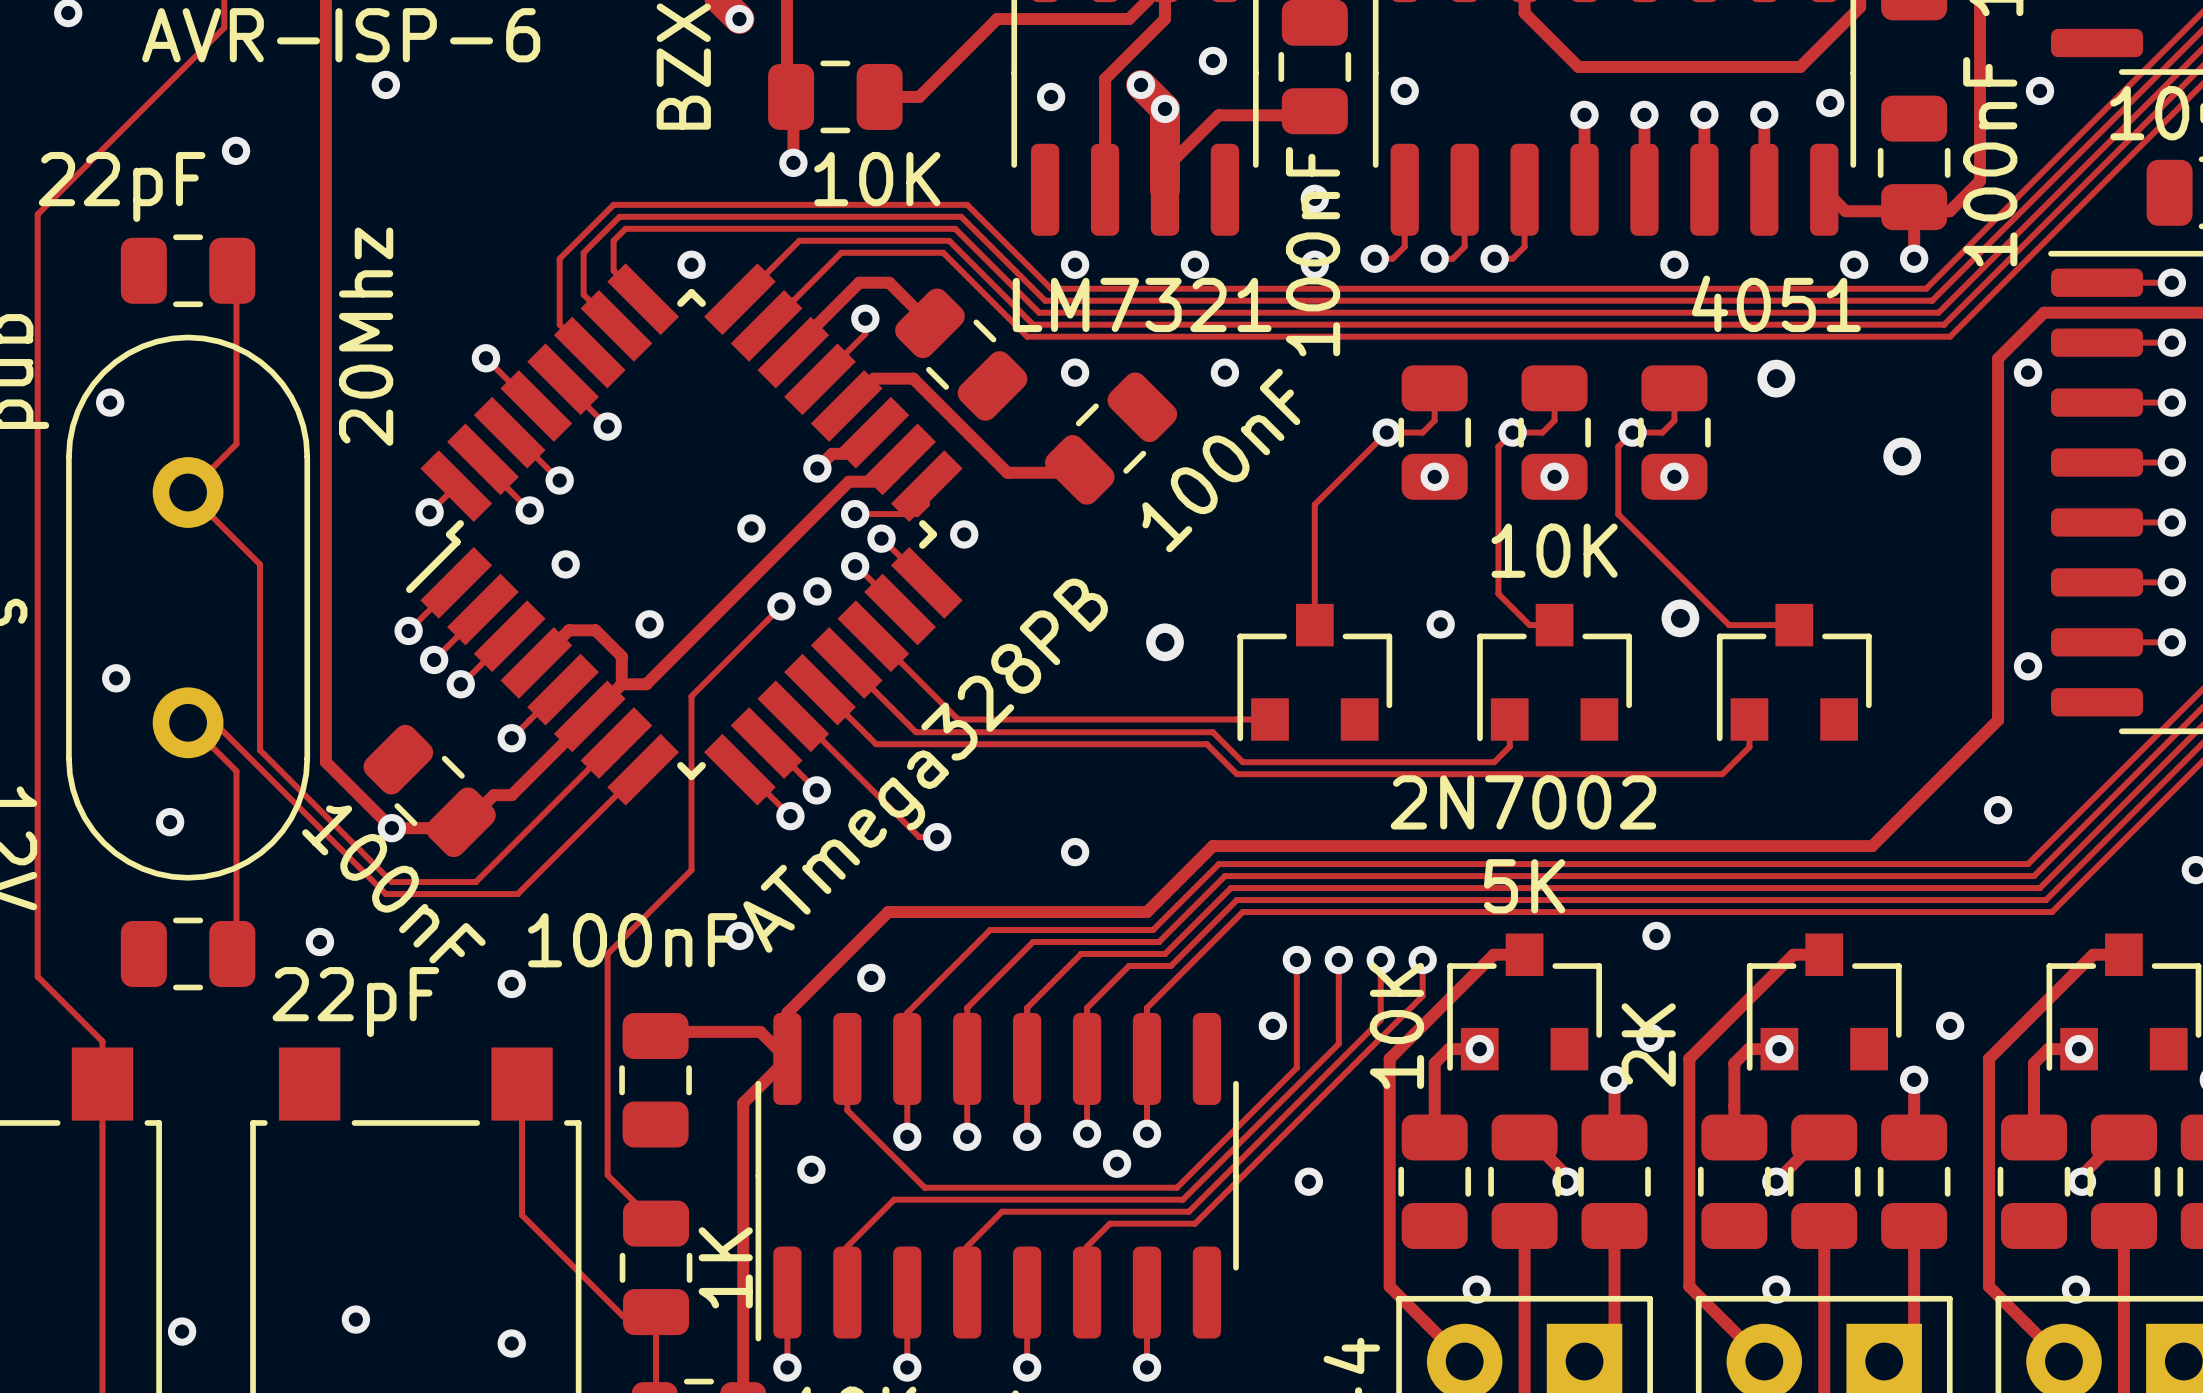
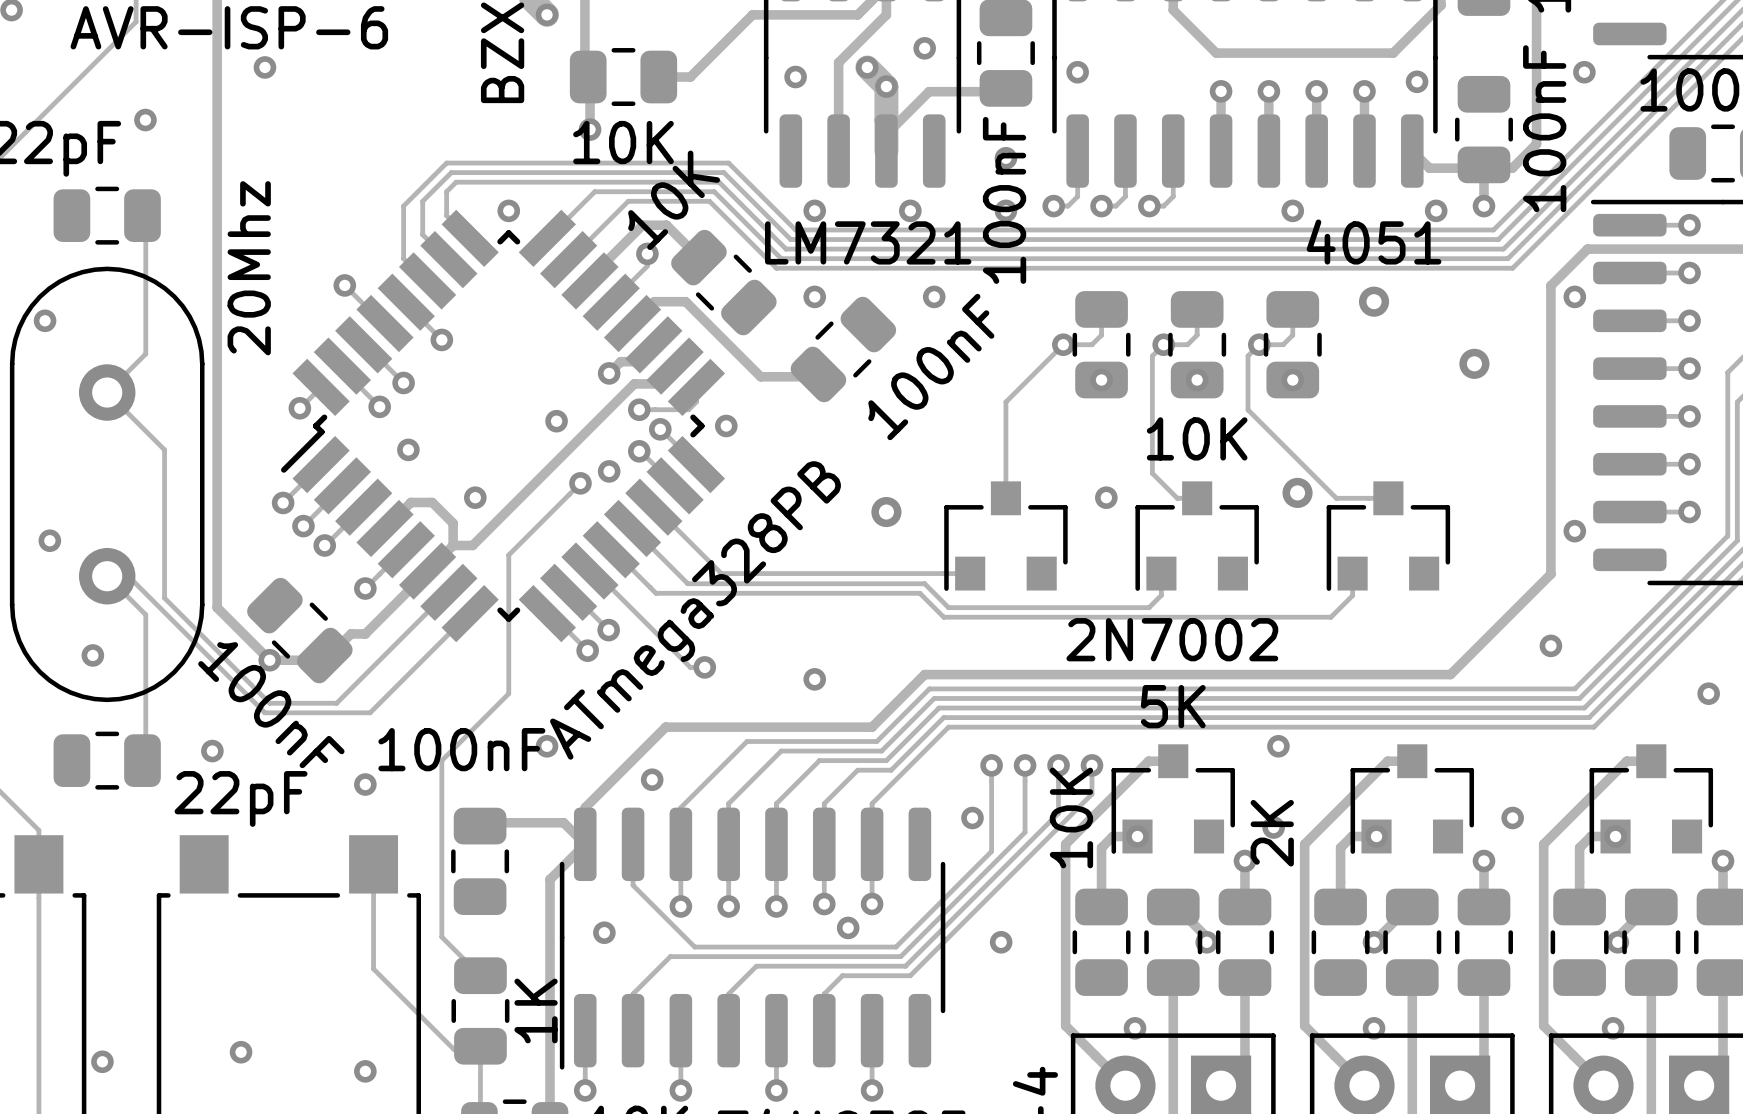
part value position: 10K (877, 179) -> 10K (623, 142)
part value: none -> 10K (674, 200)

